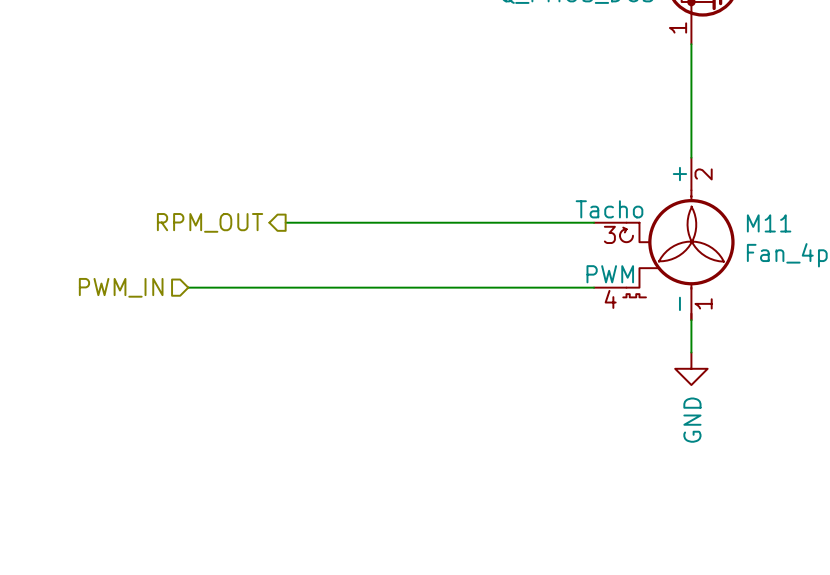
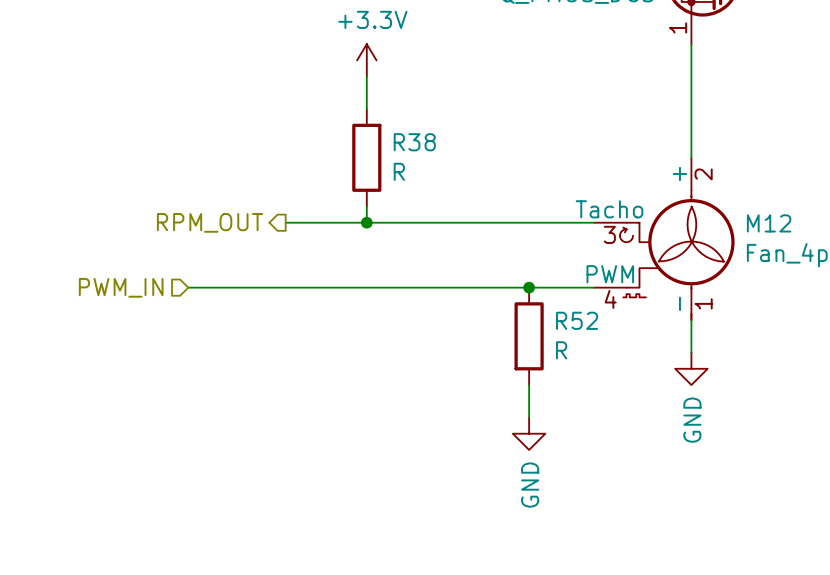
power symbol: none -> +3.3V (366, 60)
wire: none -> (366, 76) (366, 109)
R38: none -> R (366, 157)
wire: none -> (366, 206) (366, 222)
junction: none -> (366, 222)
M11 name: M11 (769, 223) -> M12 (769, 223)
junction: none -> (529, 287)
R52: none -> R (529, 336)
wire: none -> (529, 385) (529, 417)
power symbol: none -> GND (529, 433)

